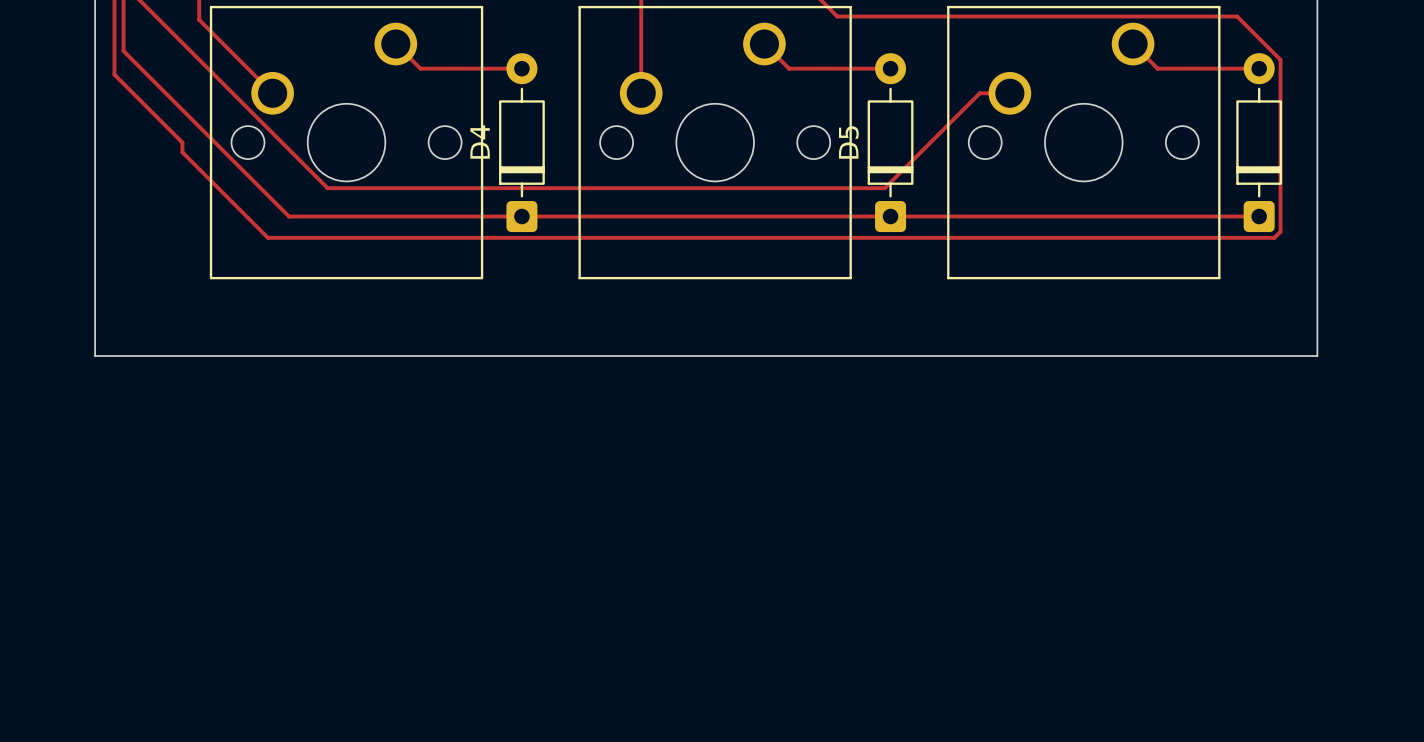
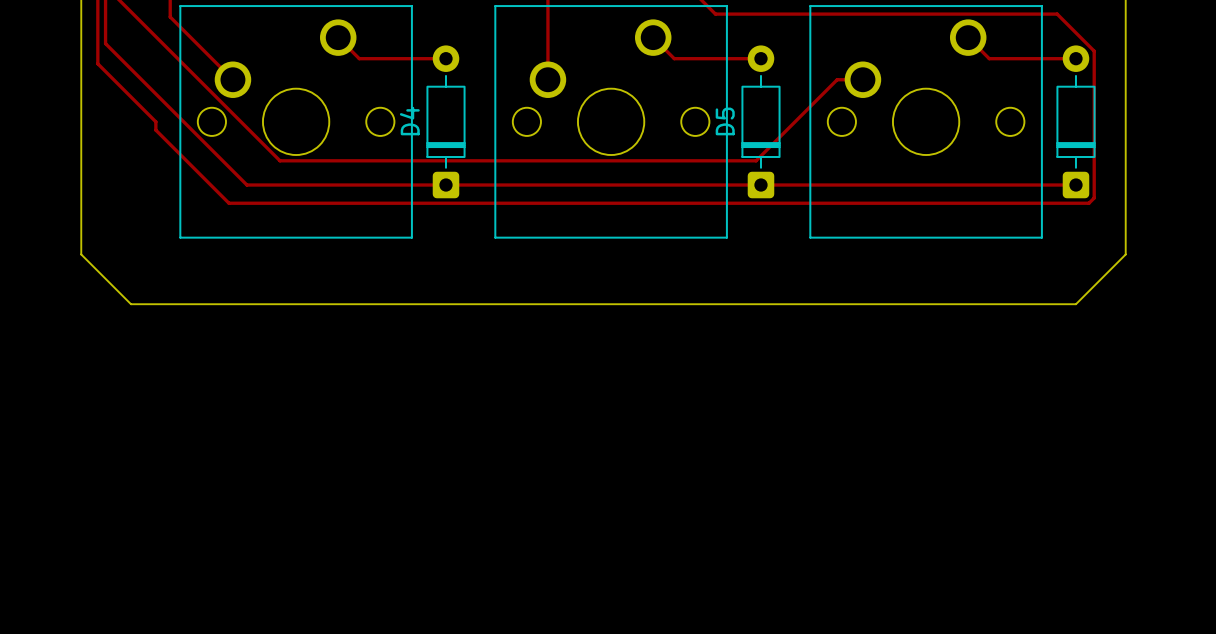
board edge: (95, 297) (95, 356) (153, 356) -> (81, 254) (131, 304)
board edge: (1317, 297) (1317, 356) (1259, 356) -> (1125, 254) (1075, 304)

